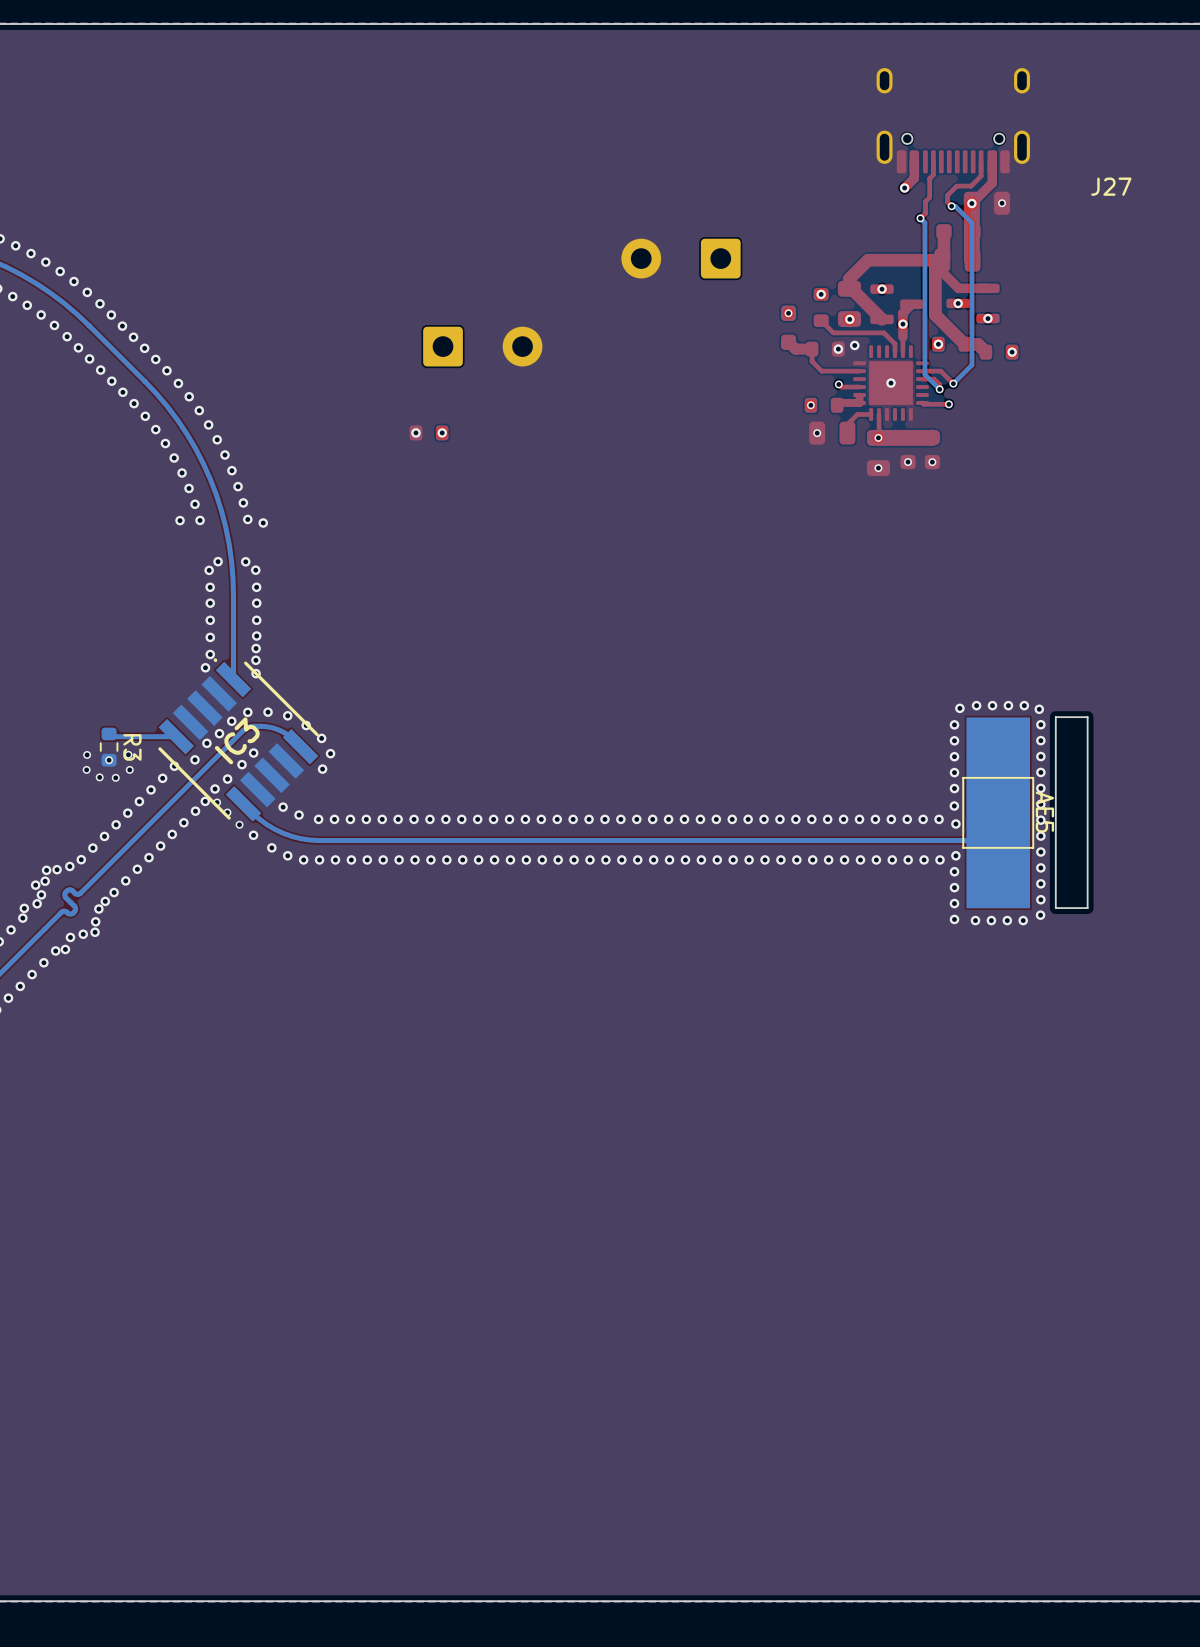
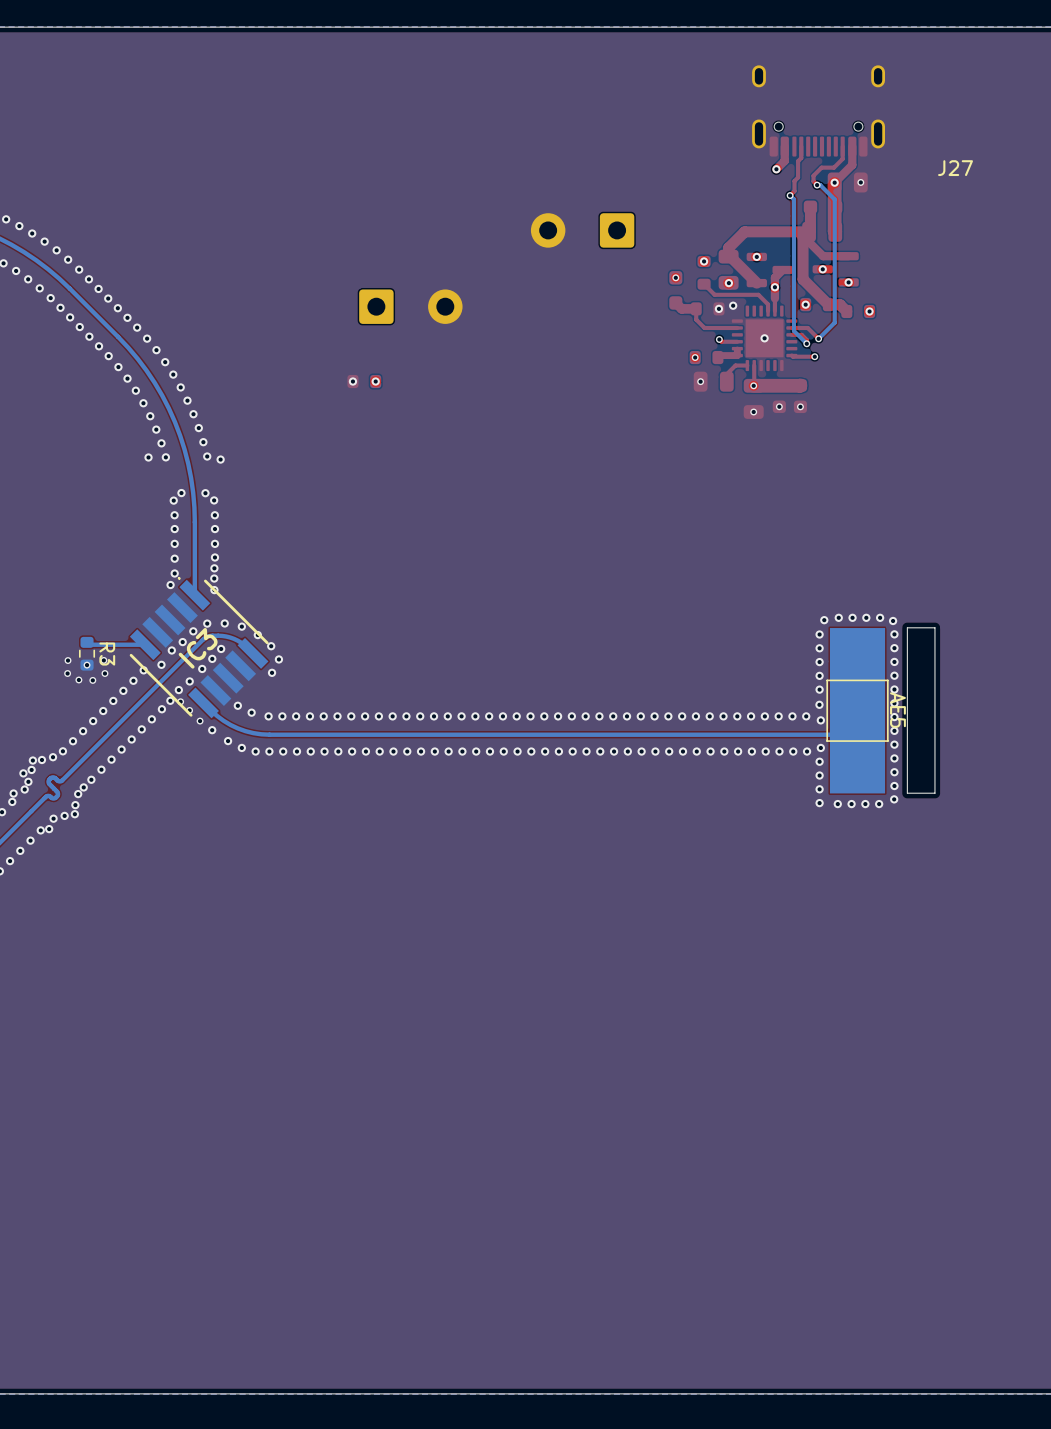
via: none -> (221, 648)

